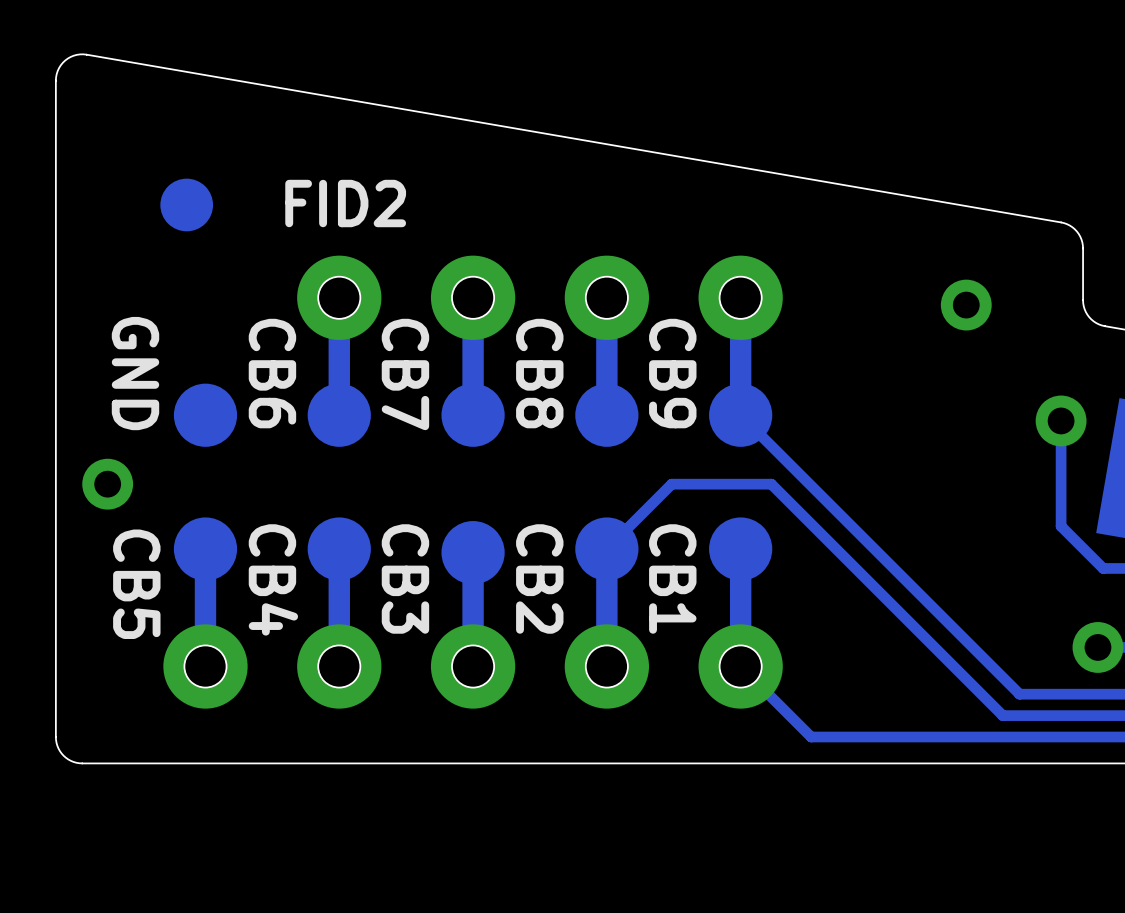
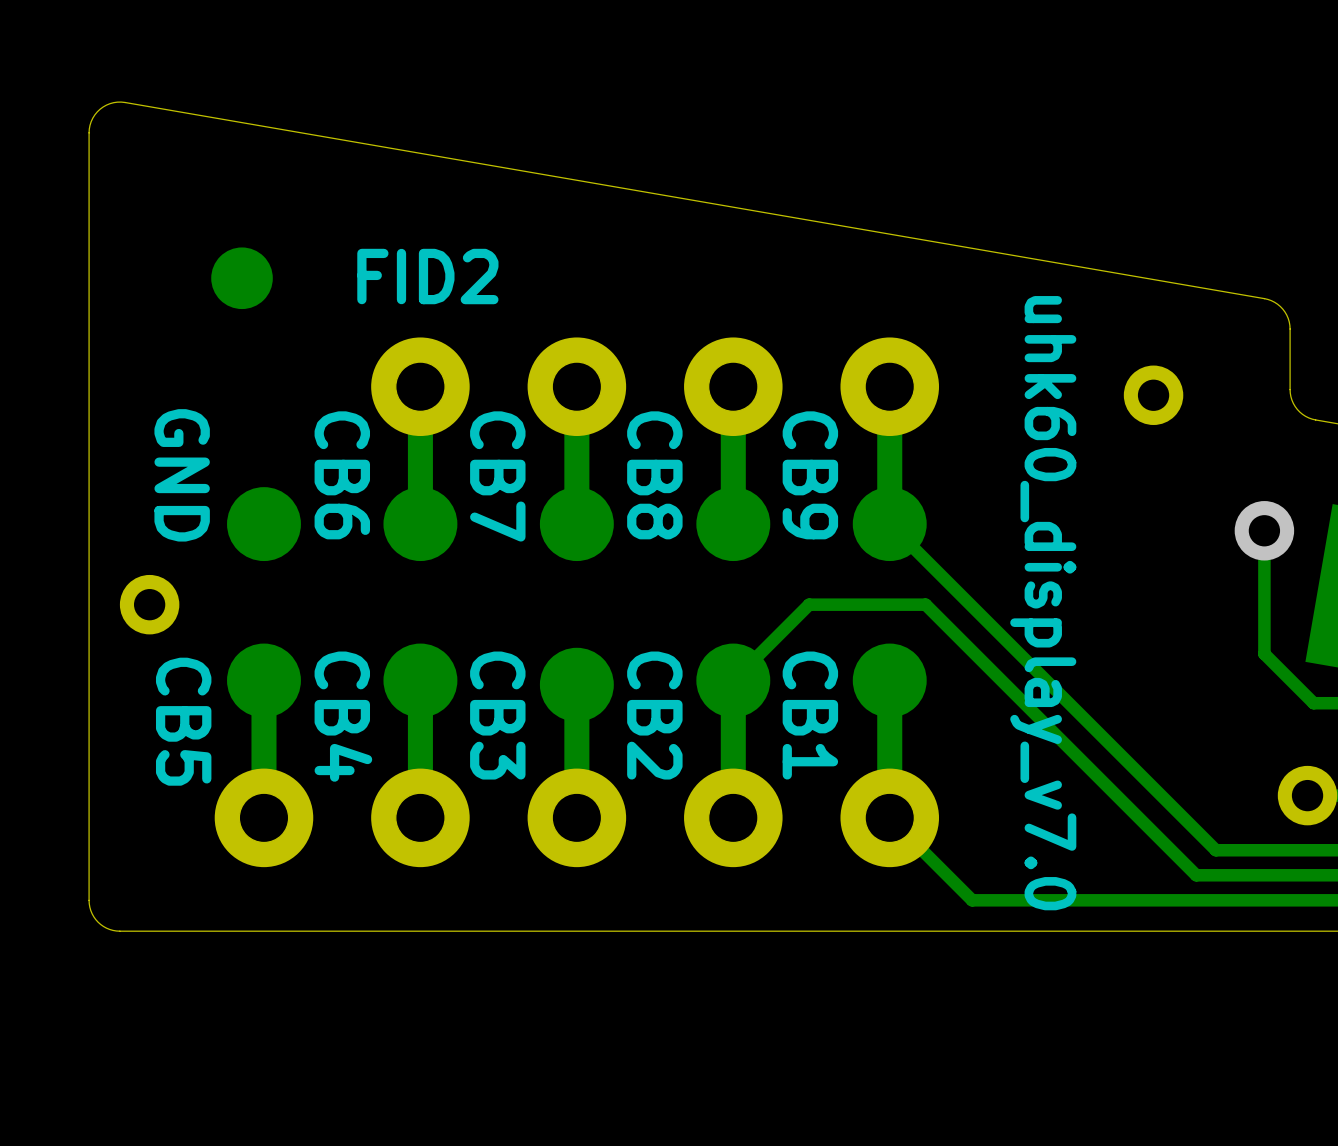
text: none -> uhk60_display_v7.0 (1043, 603)

